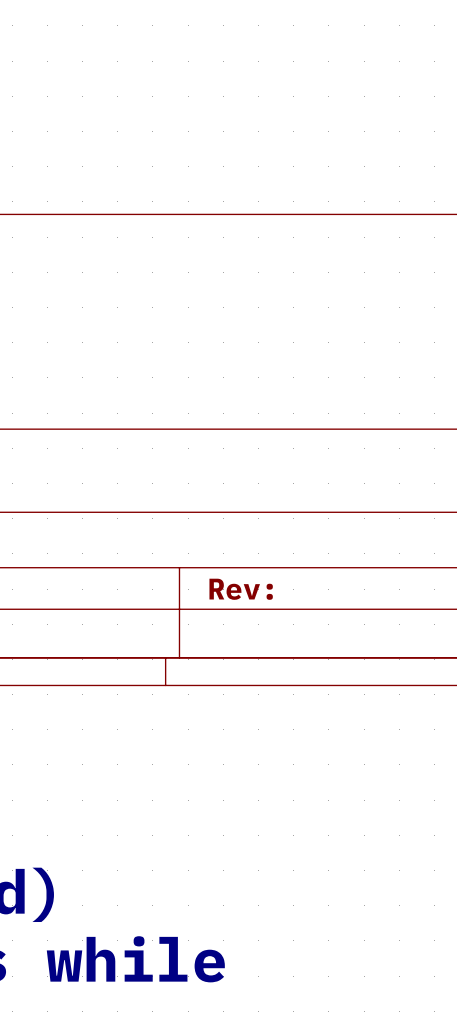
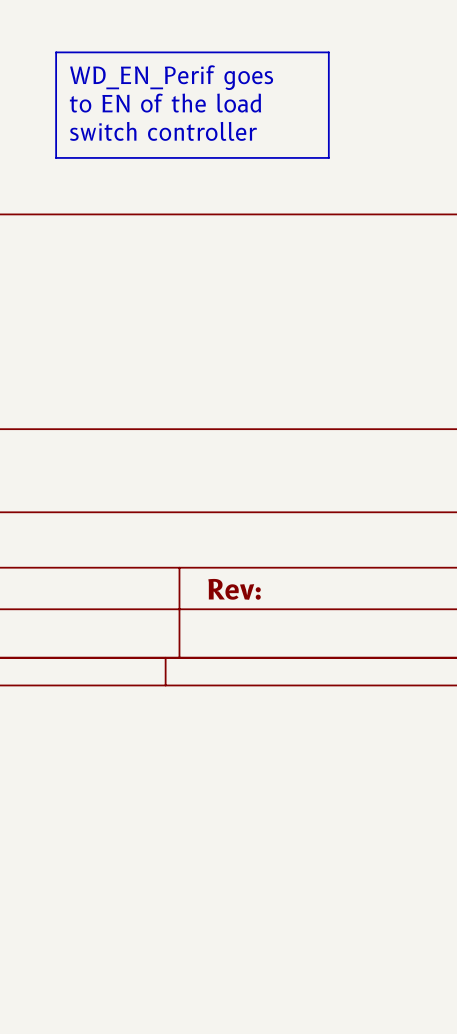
line: none -> (56, 52) (328, 52) (328, 157) (56, 157) (56, 52)
text: none -> WD_EN_Perif goes (171, 77)
text: none -> to EN of the load (165, 103)
text: none -> switch controller (163, 131)

